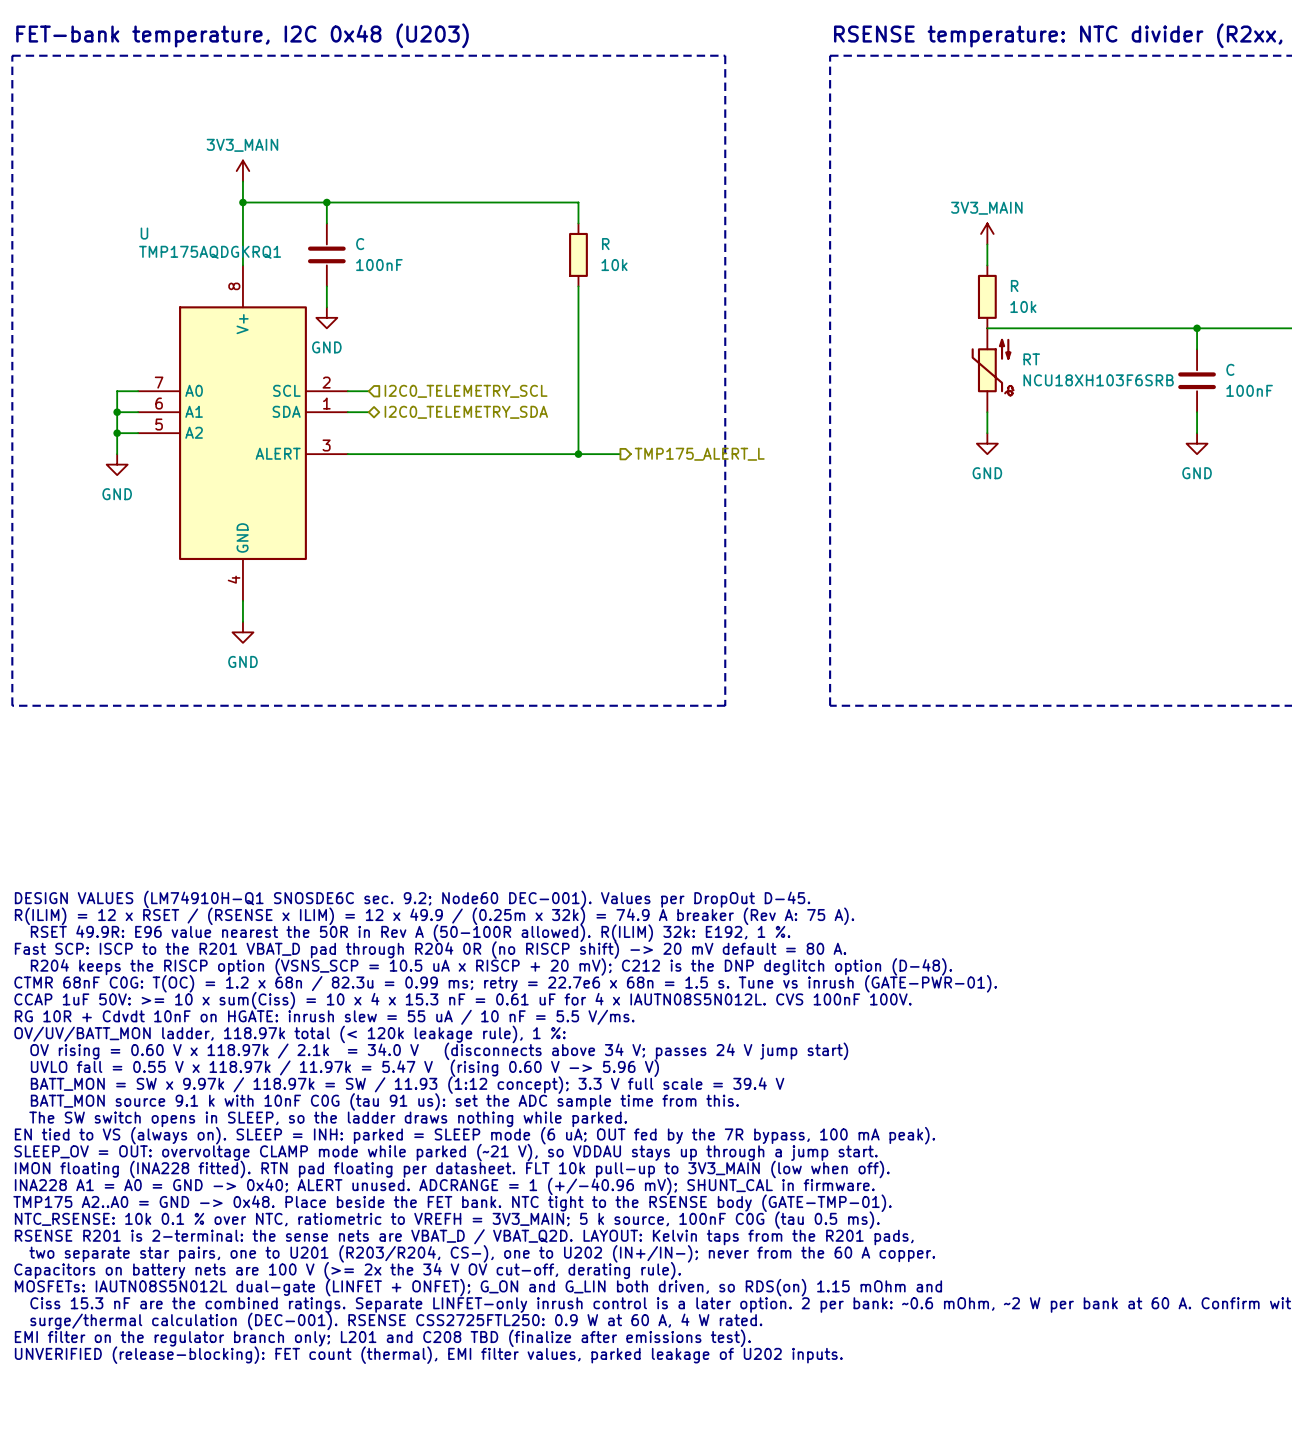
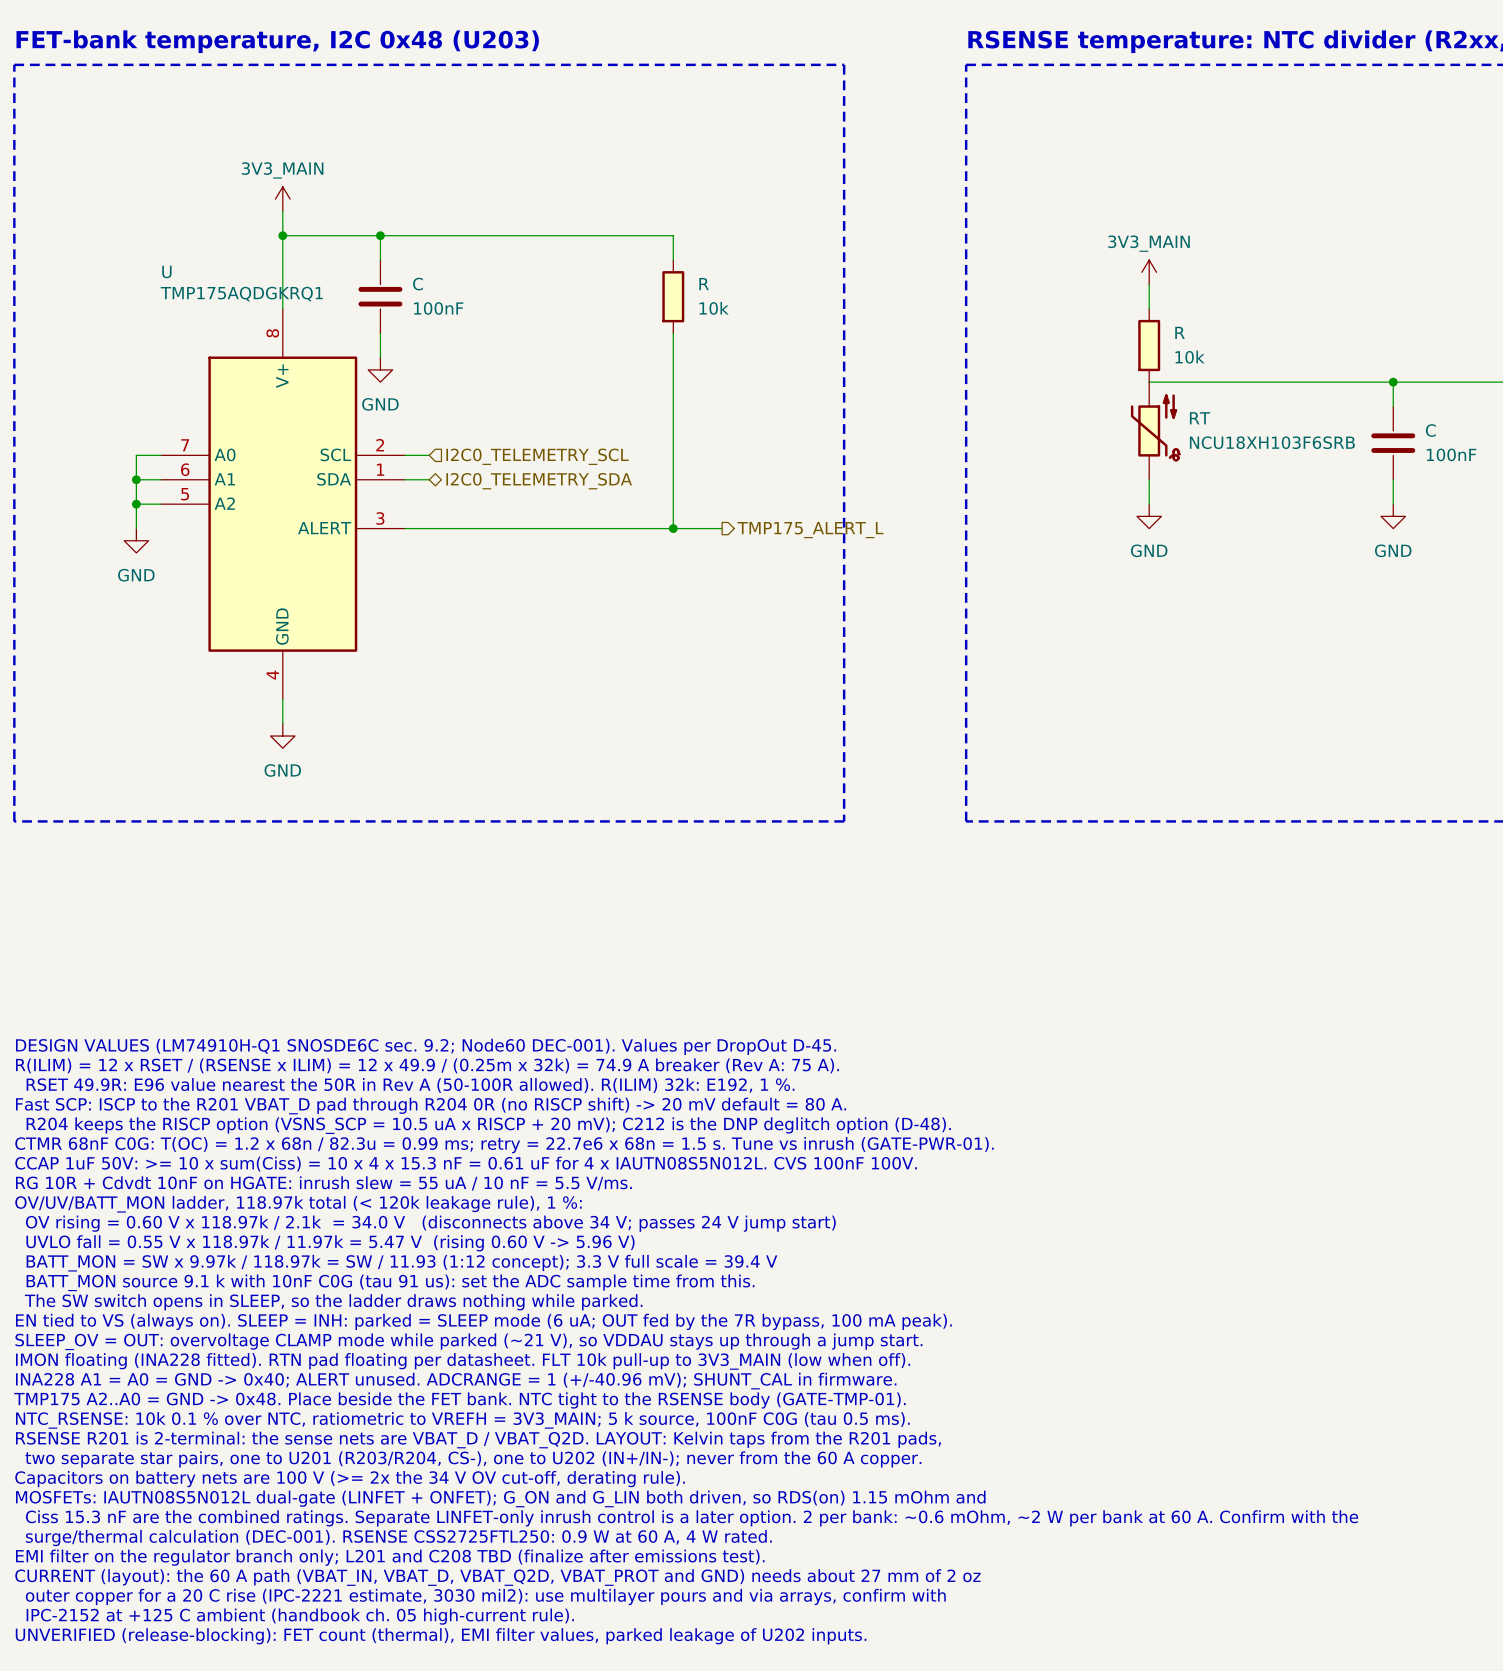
text: UNVERIFIED (release-blocking): FET count (thermal), EMI filter values, parked leakage of U202 inputs. (428, 1355) -> CURRENT (layout): the 60 A path (VBAT_IN, VBAT_D, VBAT_Q2D, VBAT_PROT and GND) needs about 27 mm of 2 oz (497, 1577)
text: none -> outer copper for a 20 C rise (IPC-2221 estimate, 3030 mil2): use multilayer pours and via arrays, confirm with (485, 1596)
text: none -> IPC-2152 at +125 C ambient (handbook ch. 05 high-current rule). (300, 1616)
text: none -> UNVERIFIED (release-blocking): FET count (thermal), EMI filter values, parked leakage of U202 inputs. (441, 1636)

